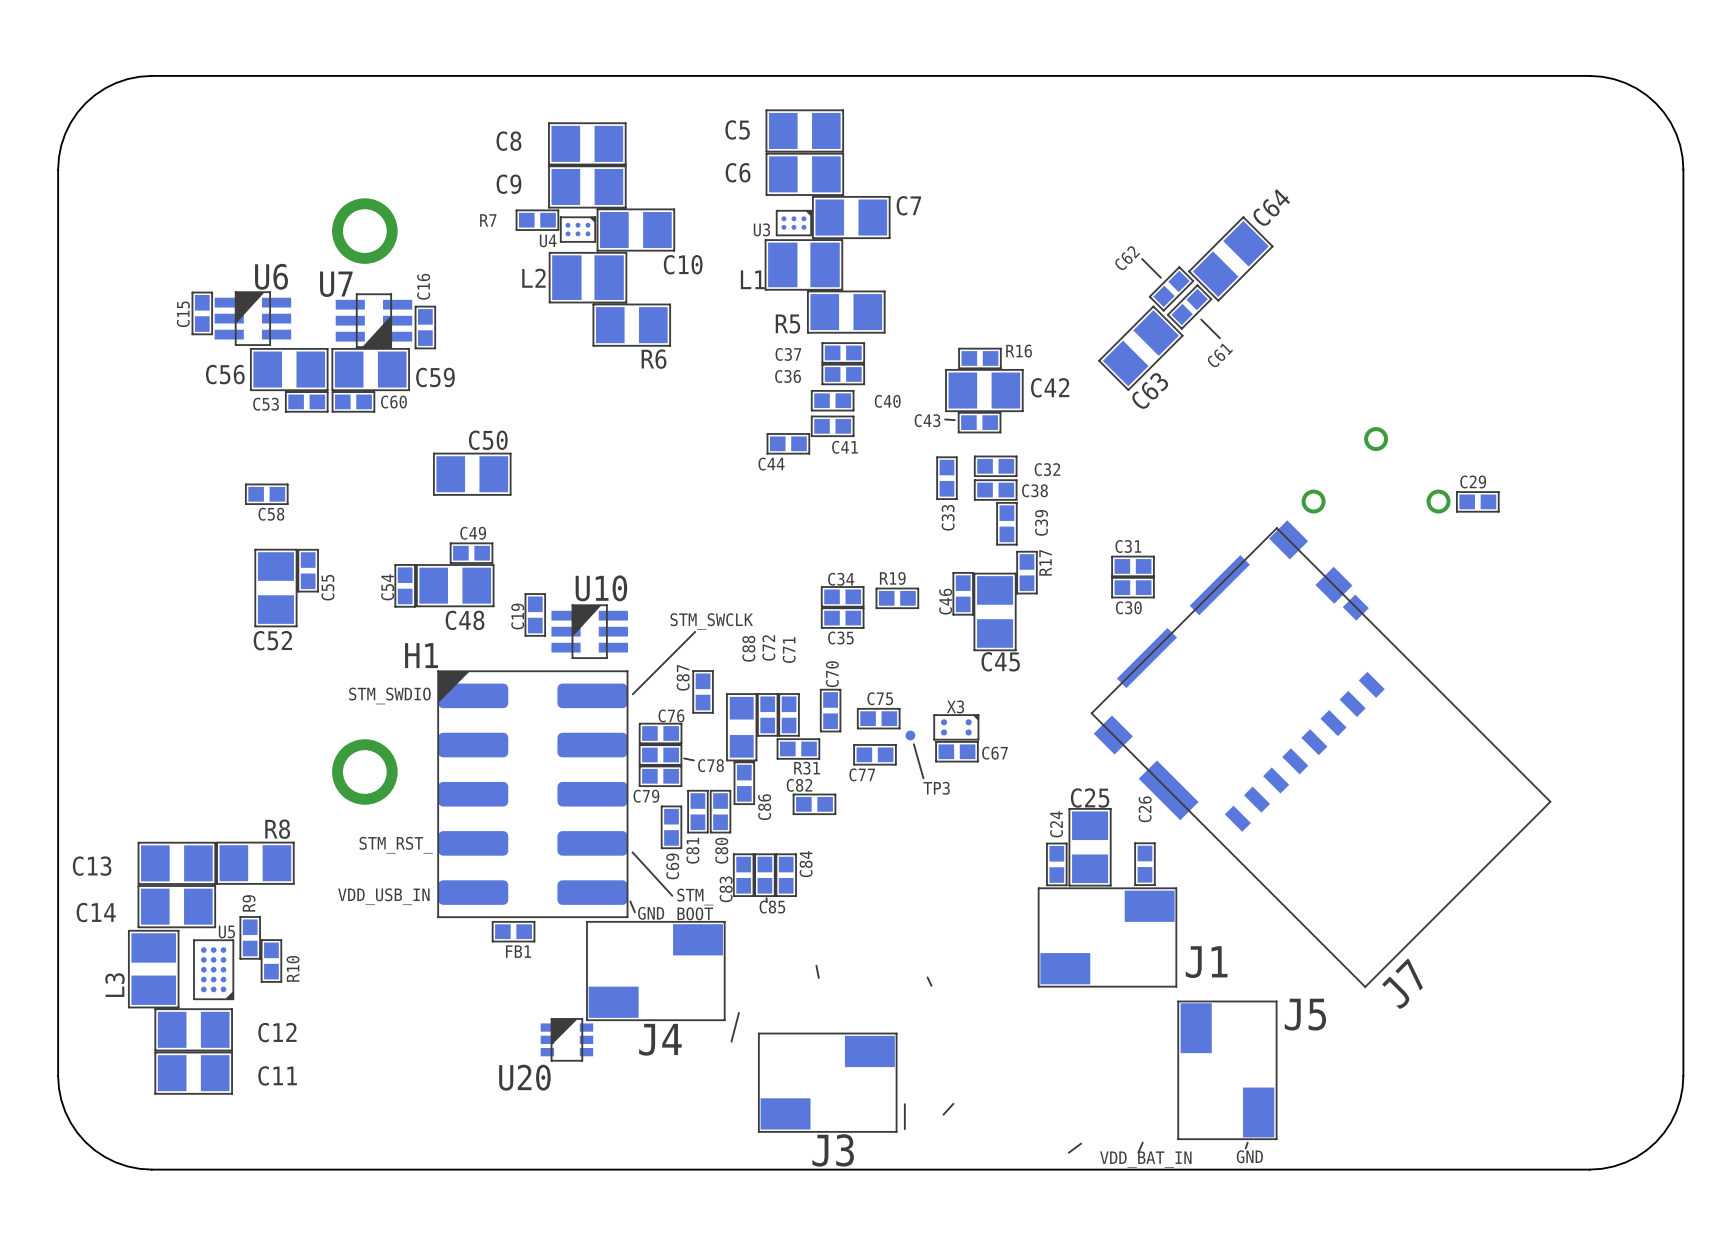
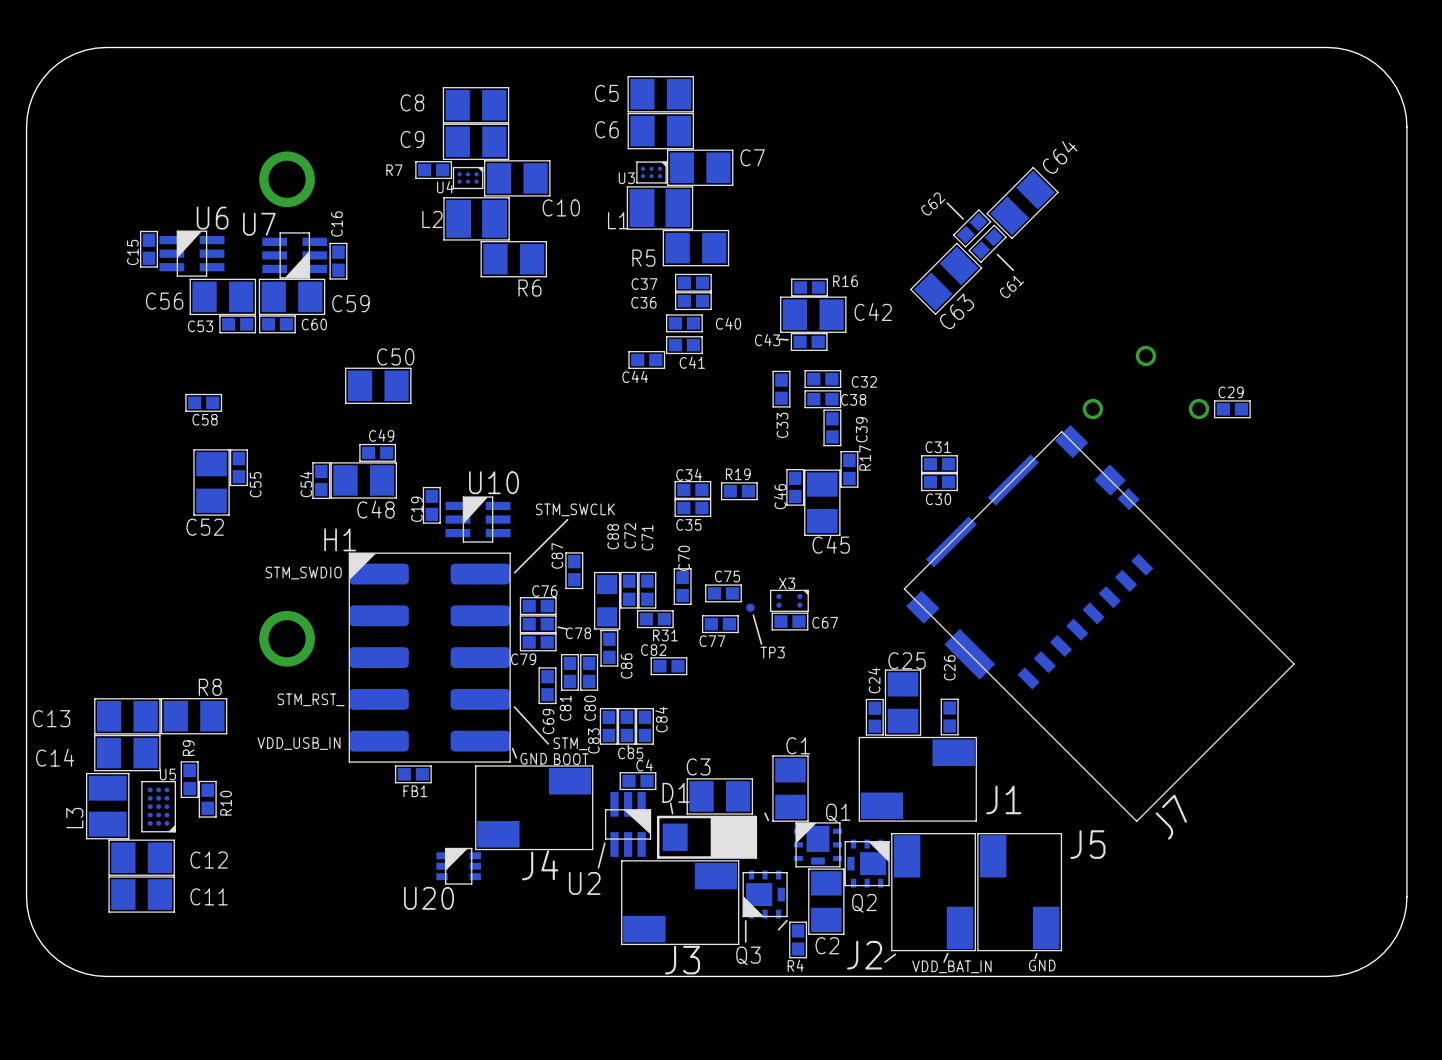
C4: none -> (637, 781)
C1: none -> (790, 788)
C3: none -> (719, 796)
U2: none -> (628, 824)
D1: none -> (707, 837)
Q1: none -> (818, 844)
Q2: none -> (867, 863)
J2: none -> (933, 892)
Q3: none -> (765, 894)
C2: none -> (826, 901)
R4: none -> (798, 939)

